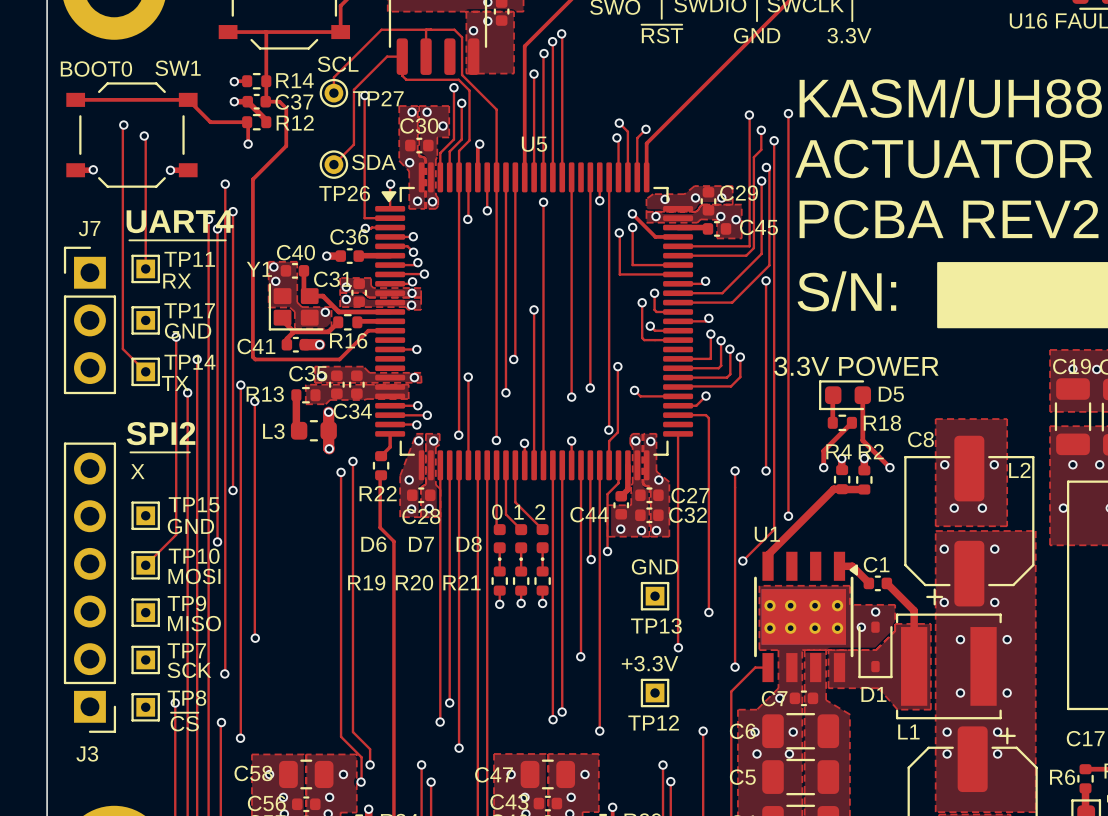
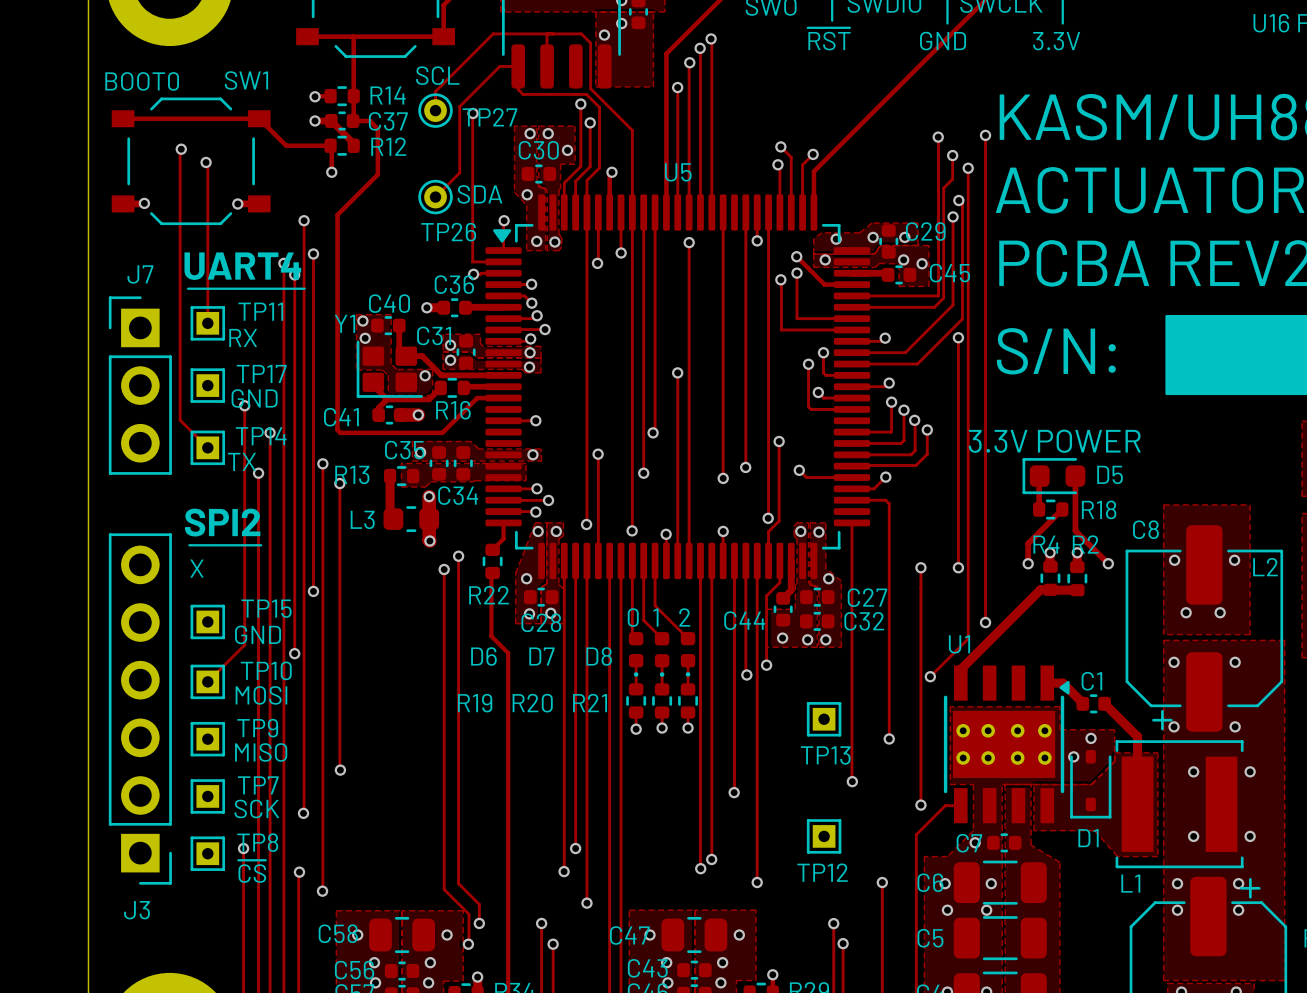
text: GND (655, 566) -> none
text: +3.3V (650, 663) -> none

